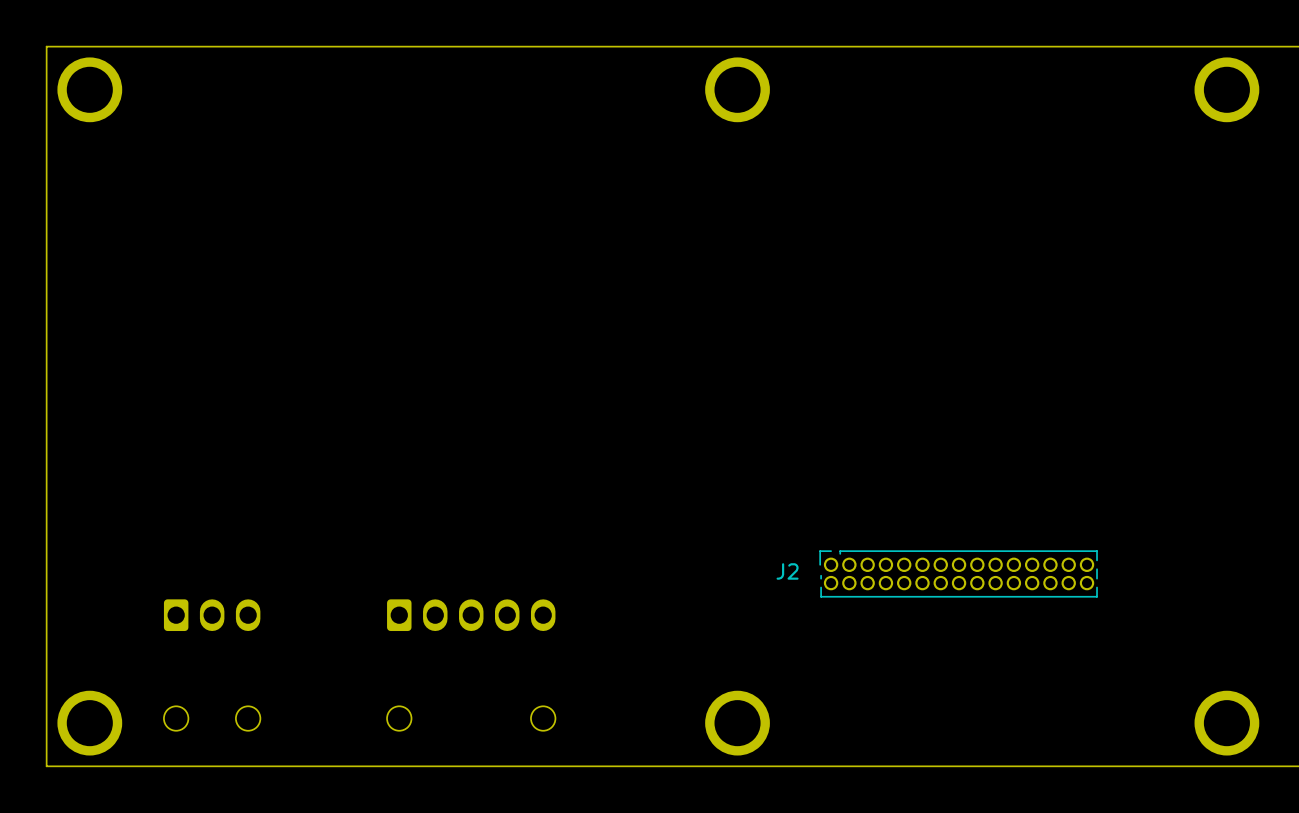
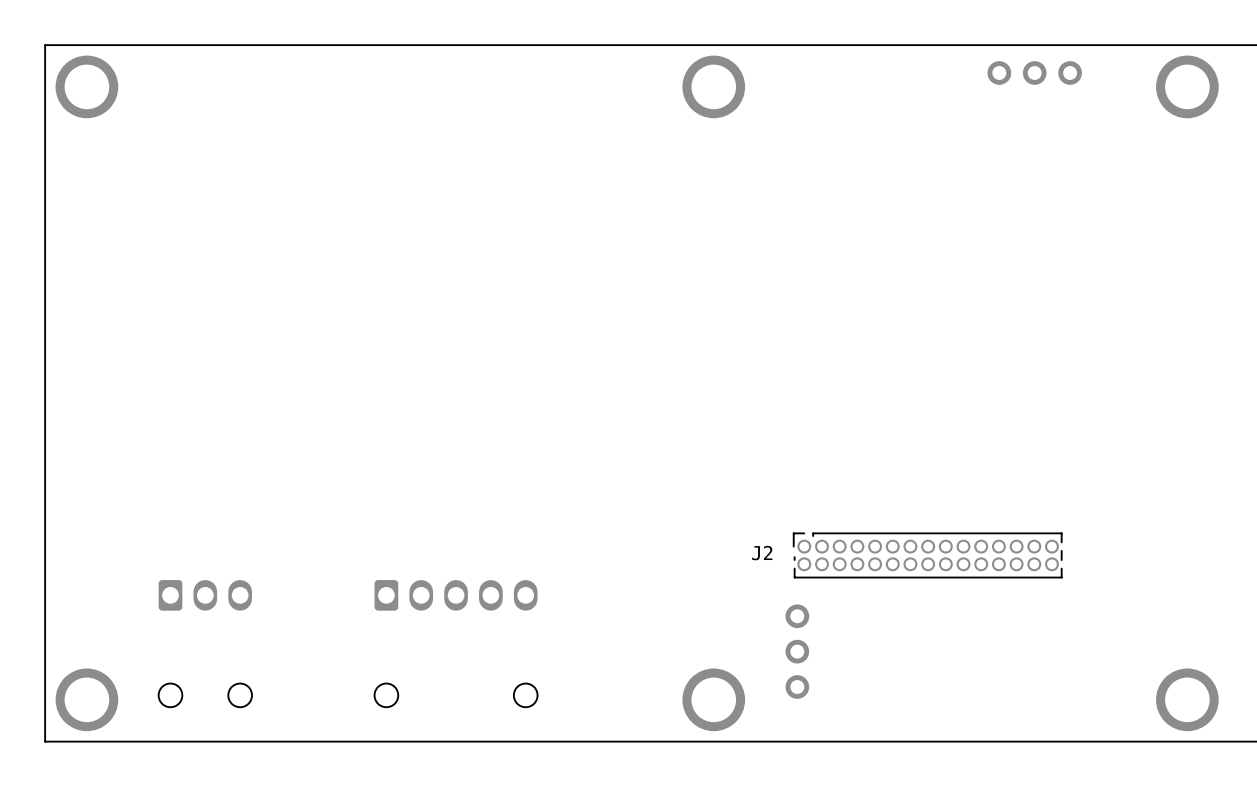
part: none -> (1034, 72)
part: none -> (797, 651)

